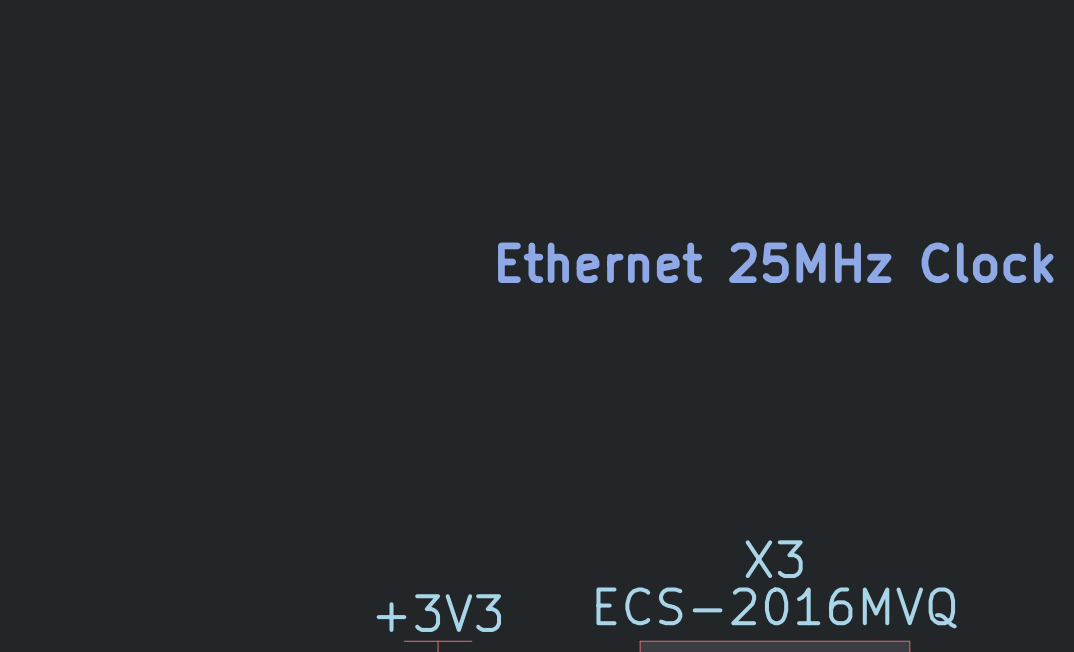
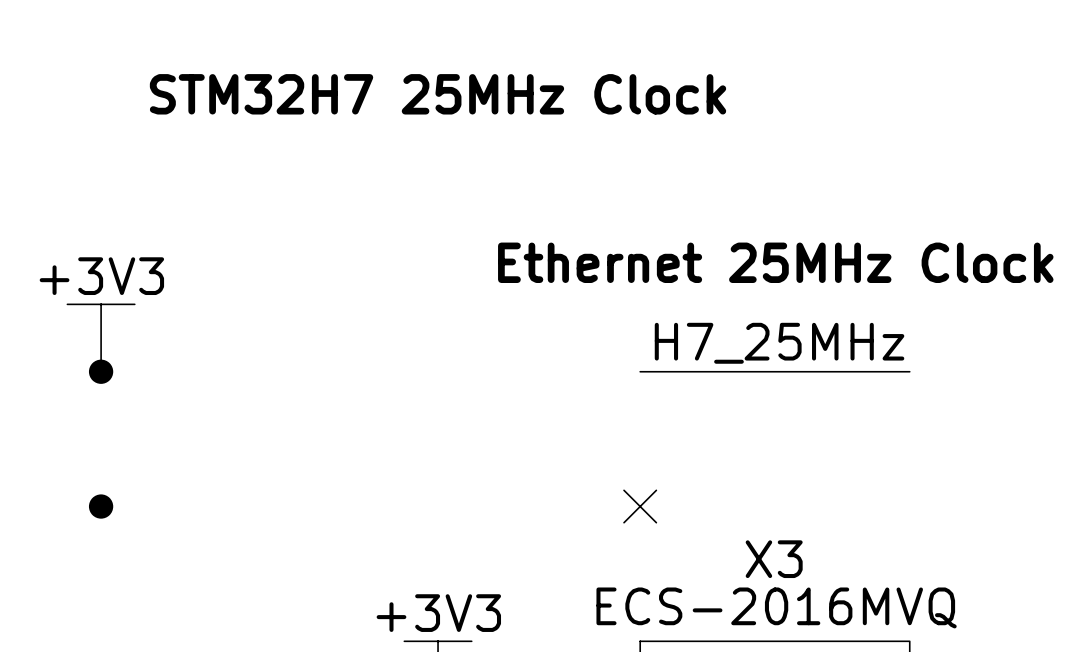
text: none -> STM32H7 25MHz Clock (438, 94)
power symbol: none -> +3V3 (101, 338)
label: none -> H7_25MHz (779, 343)
junction: none -> (101, 371)
wire: none -> (640, 371) (909, 371)
junction: none -> (101, 506)
no-connect mark: none -> (640, 506)

